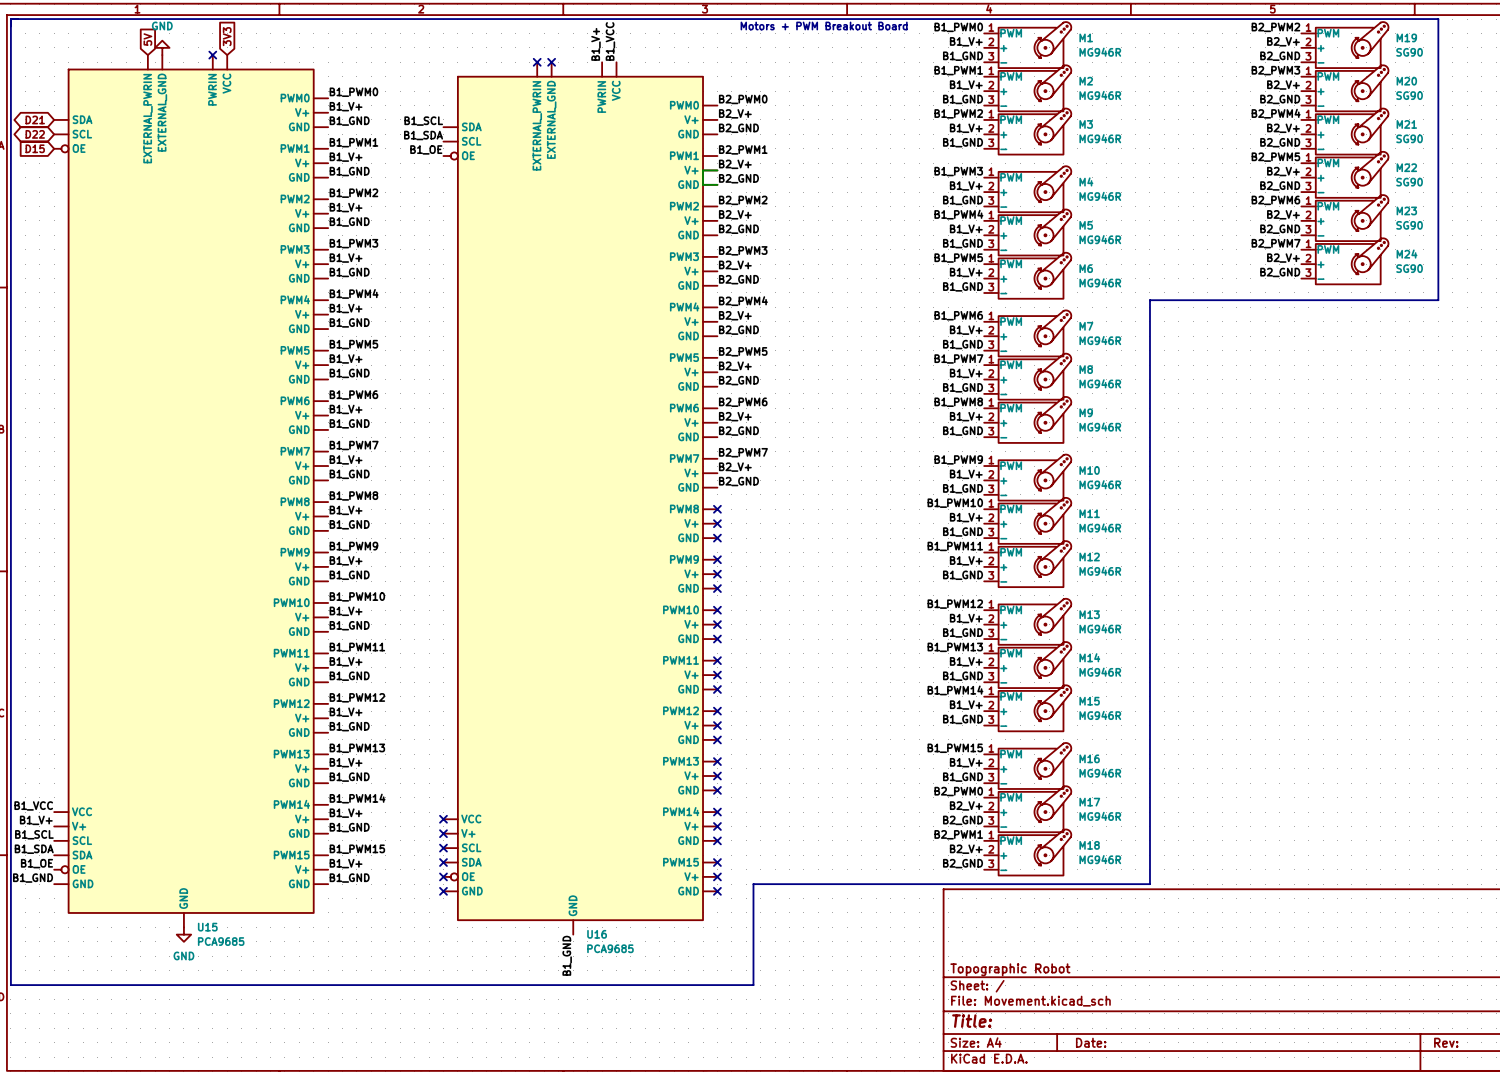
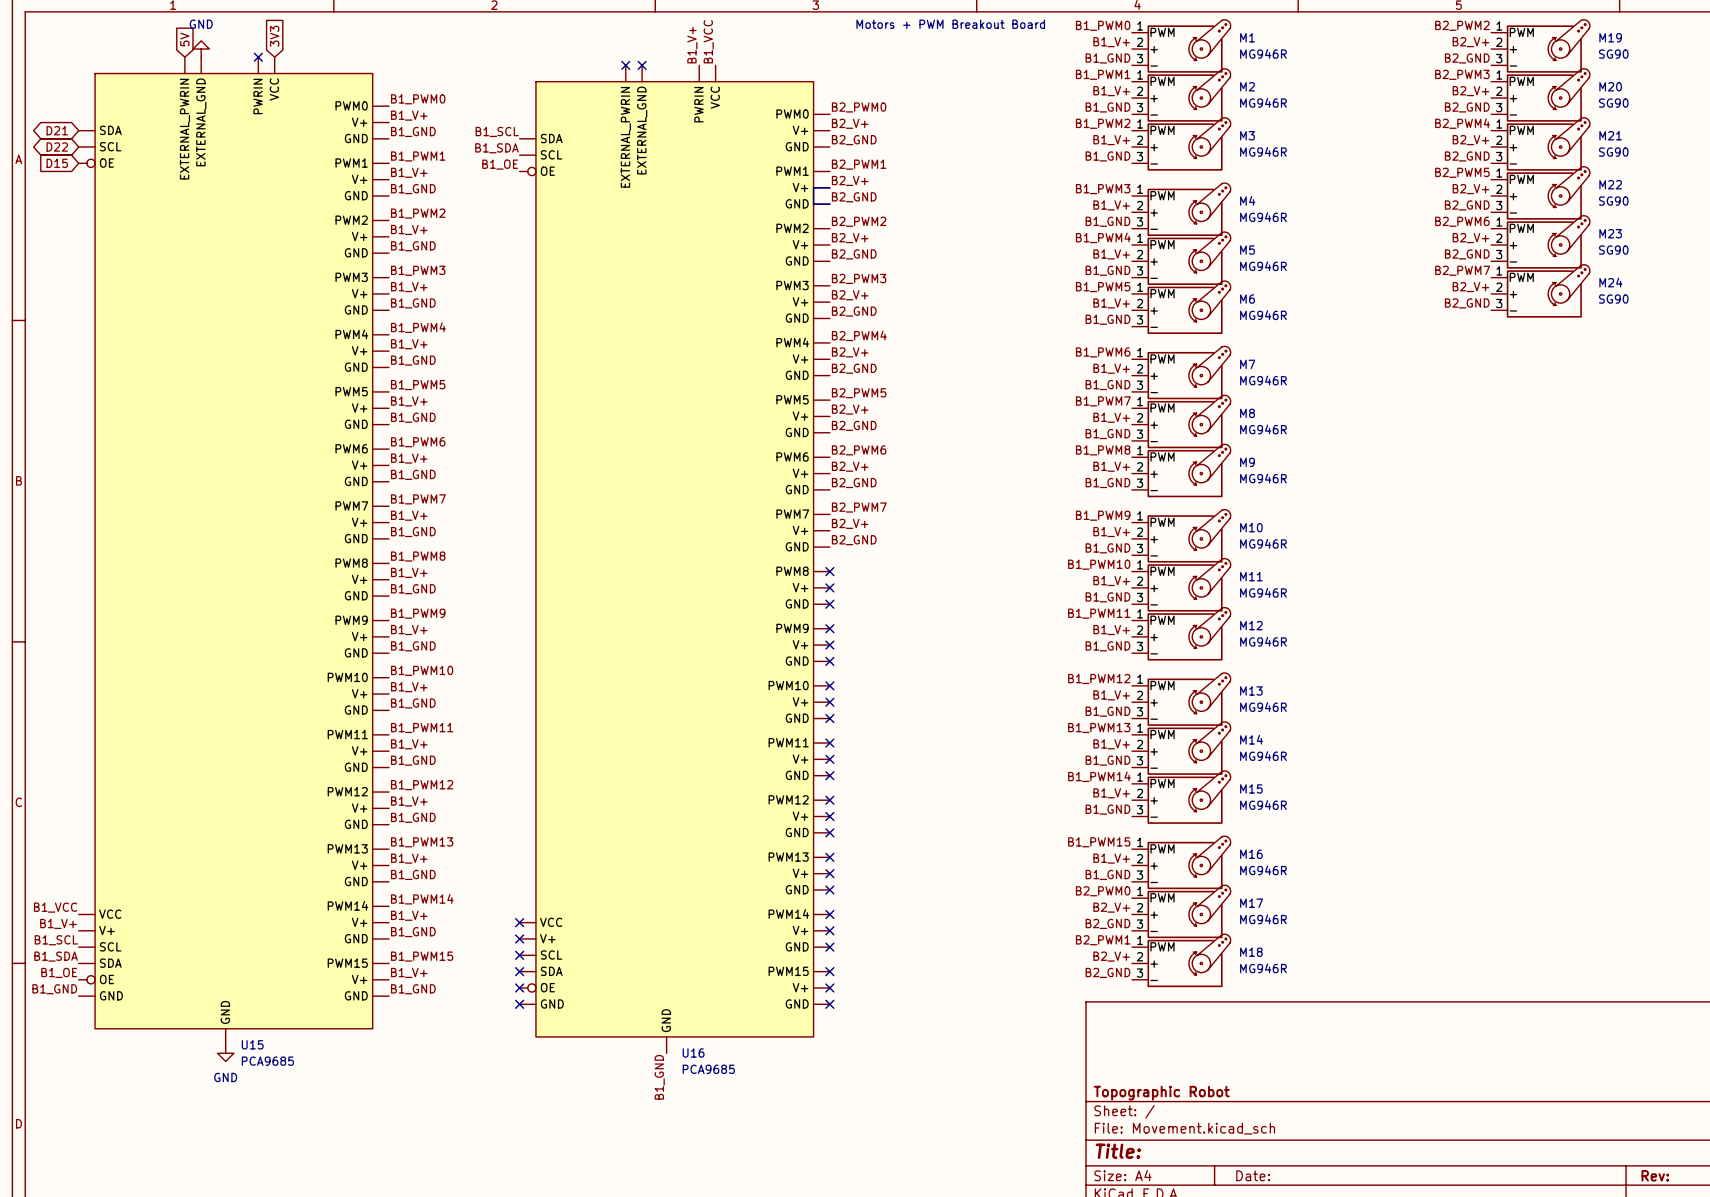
line: (10, 19) (10, 985) (753, 985) (753, 884) (1149, 884) (1149, 300) (1438, 300) (1438, 19) (10, 19) -> none

